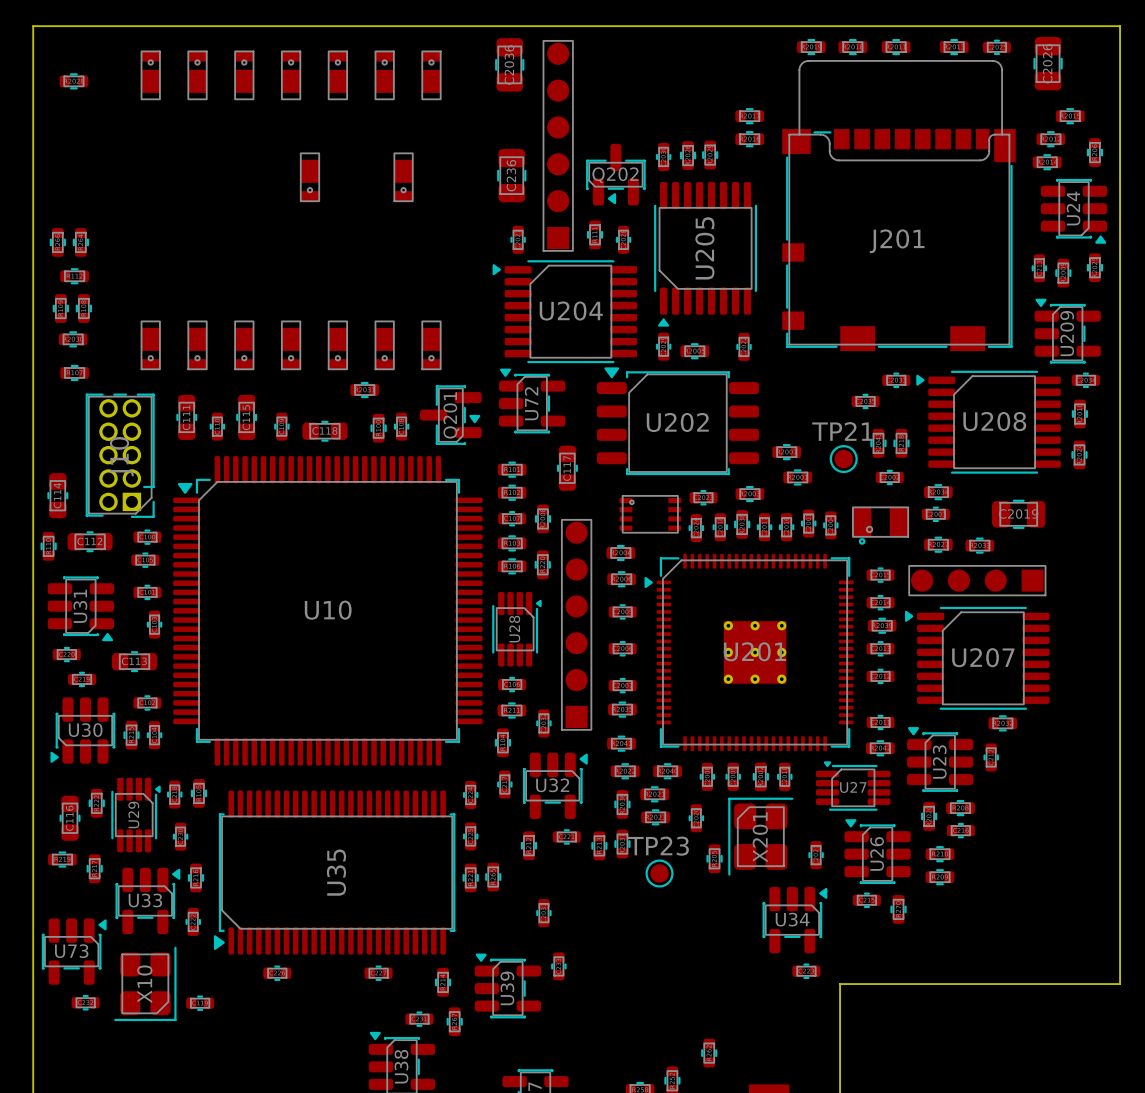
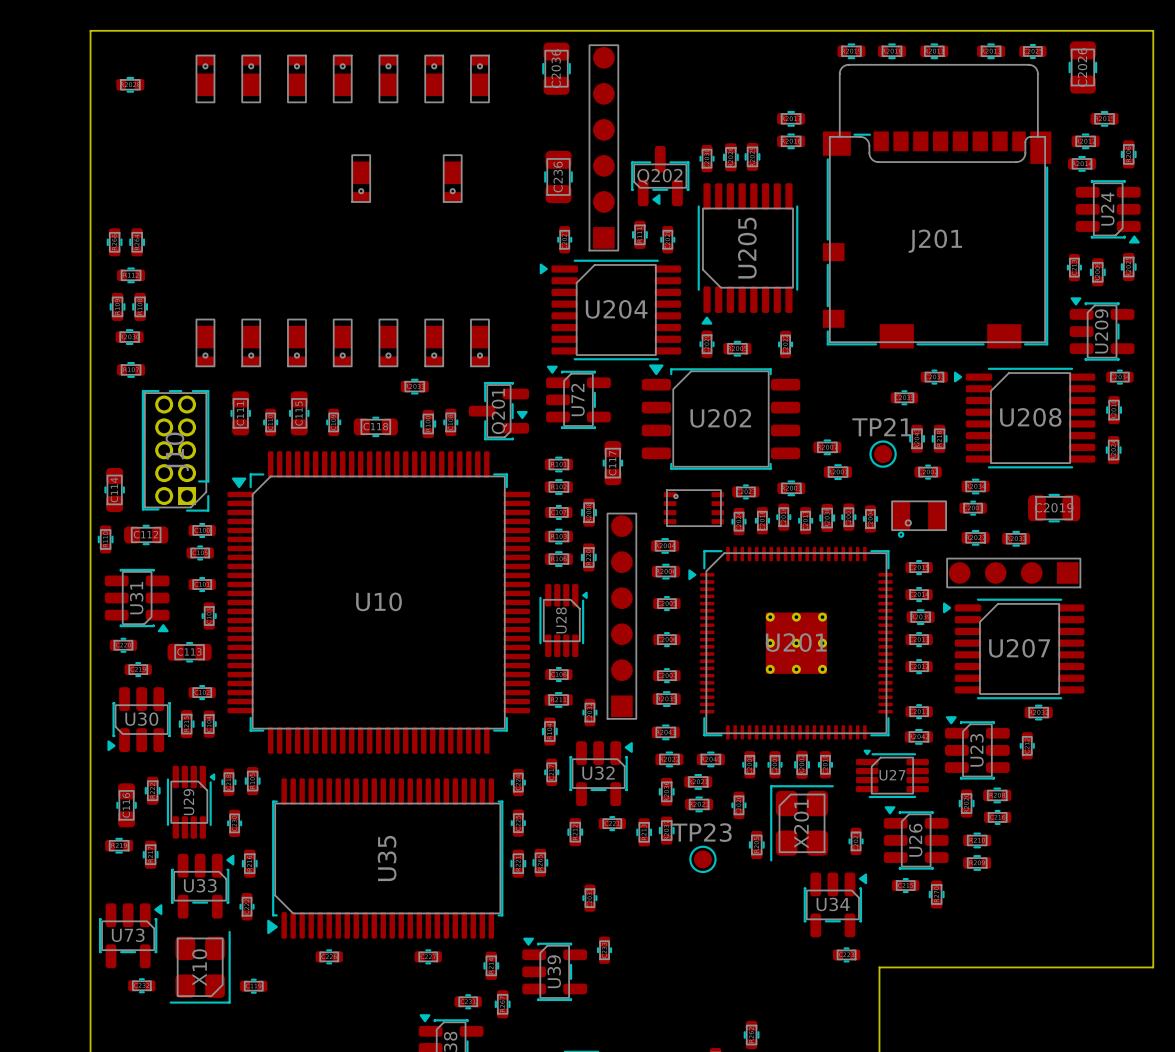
part position: (742, 524) -> (827, 518)
part position: (786, 527) -> (783, 517)

